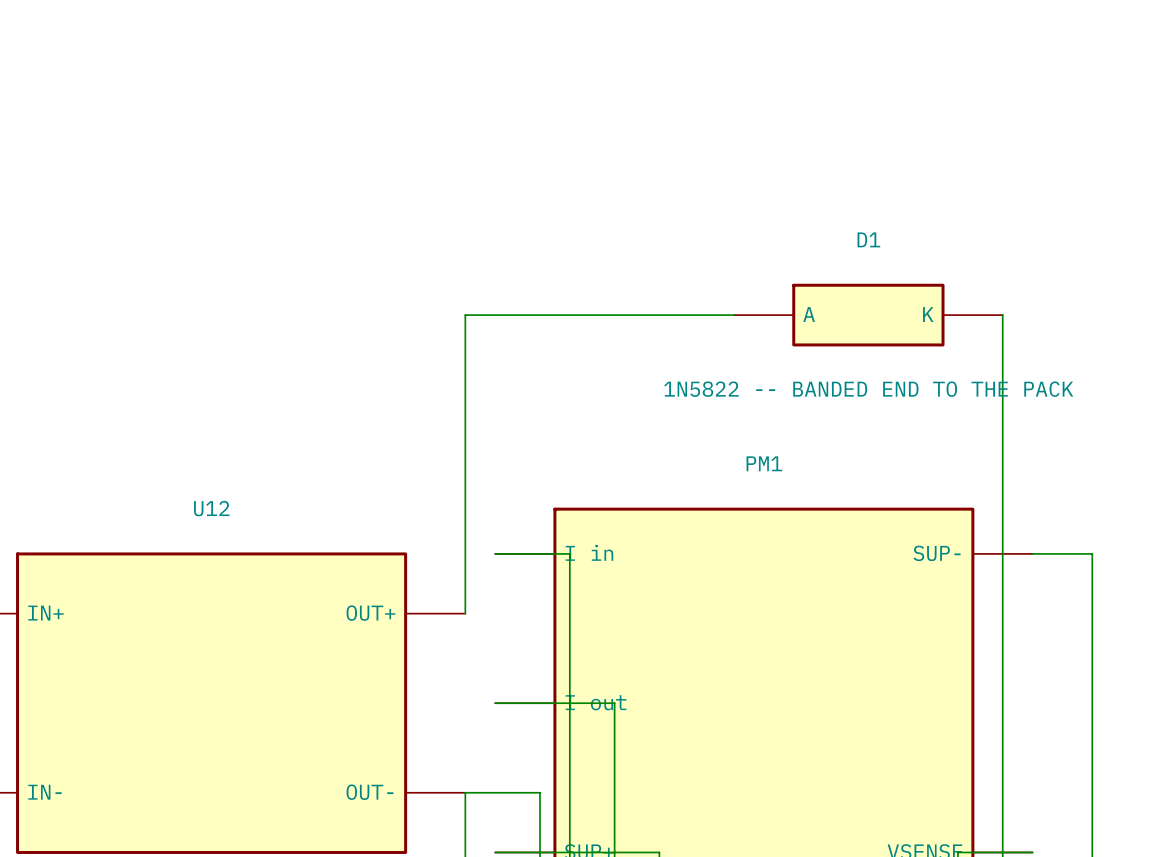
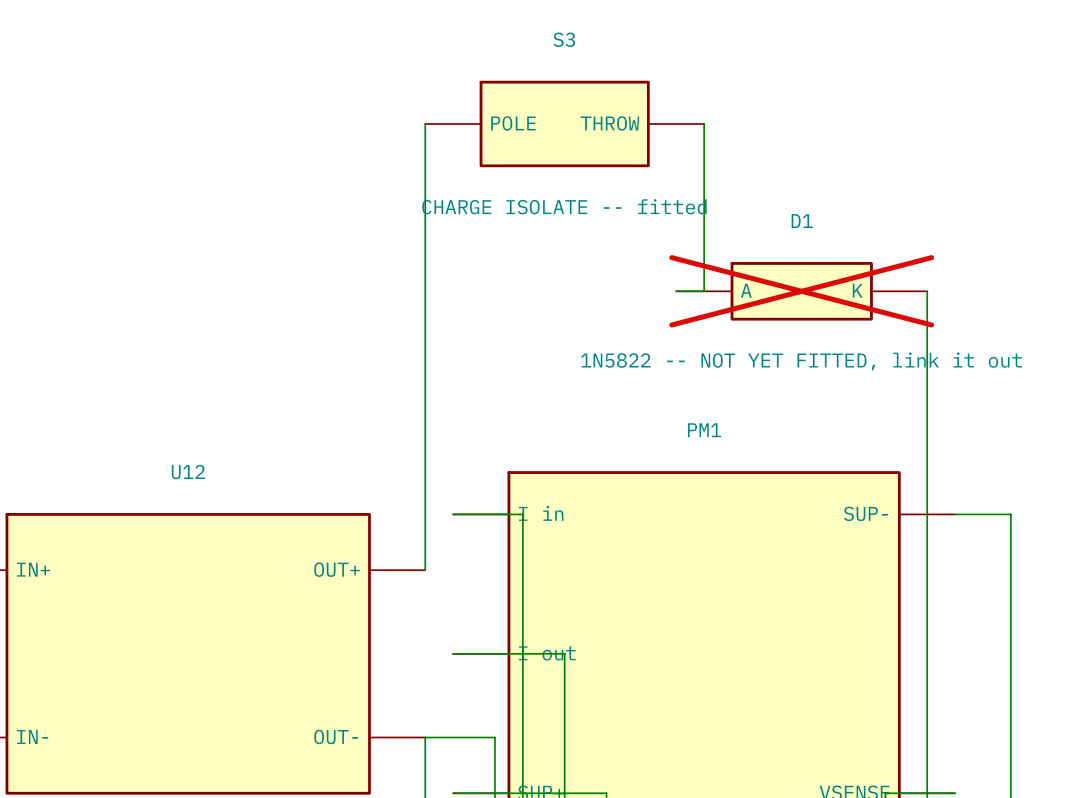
S3: none -> CHARGE ISOLATE -- fitted (564, 123)
wire: none -> (704, 123) (704, 291) (676, 291)
wire: (465, 315) (734, 315) -> (425, 291) (425, 123)
D1 do-not-place cross: none -> (801, 291)
D1 value: 1N5822 -- BANDED END TO THE PACK (868, 389) -> 1N5822 -- NOT YET FITTED, link it out (801, 361)

